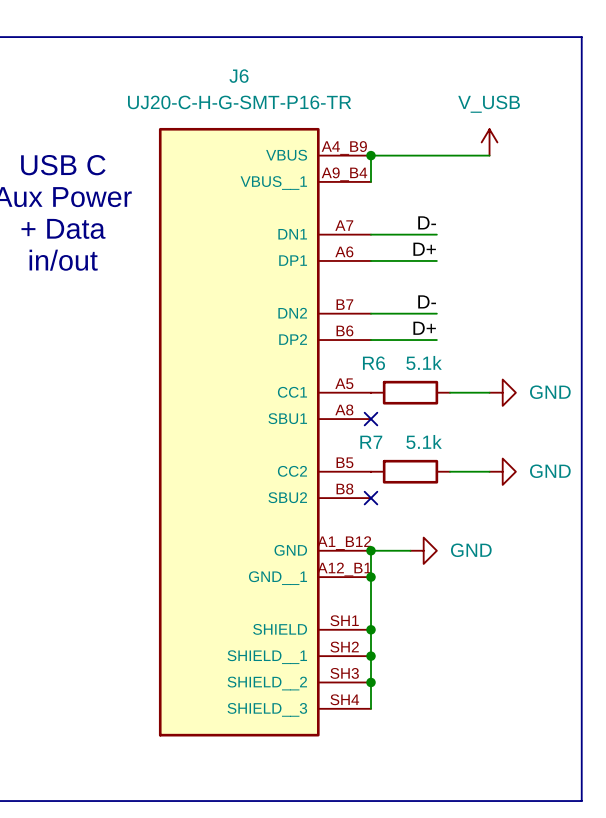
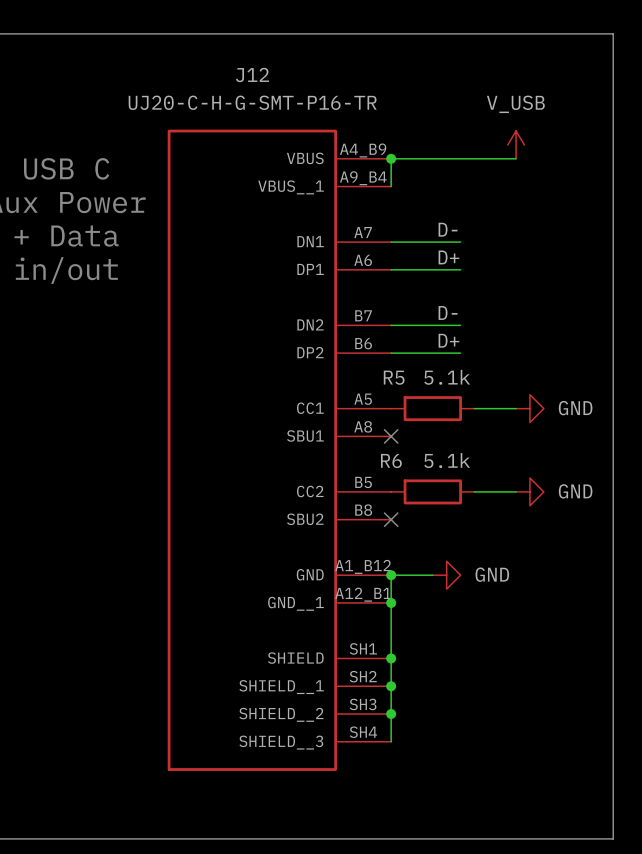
J6 name: J6 (239, 76) -> J12 (252, 75)
R6 name: R6 (373, 363) -> R5 (394, 377)
R7 name: R7 (371, 442) -> R6 (391, 460)

